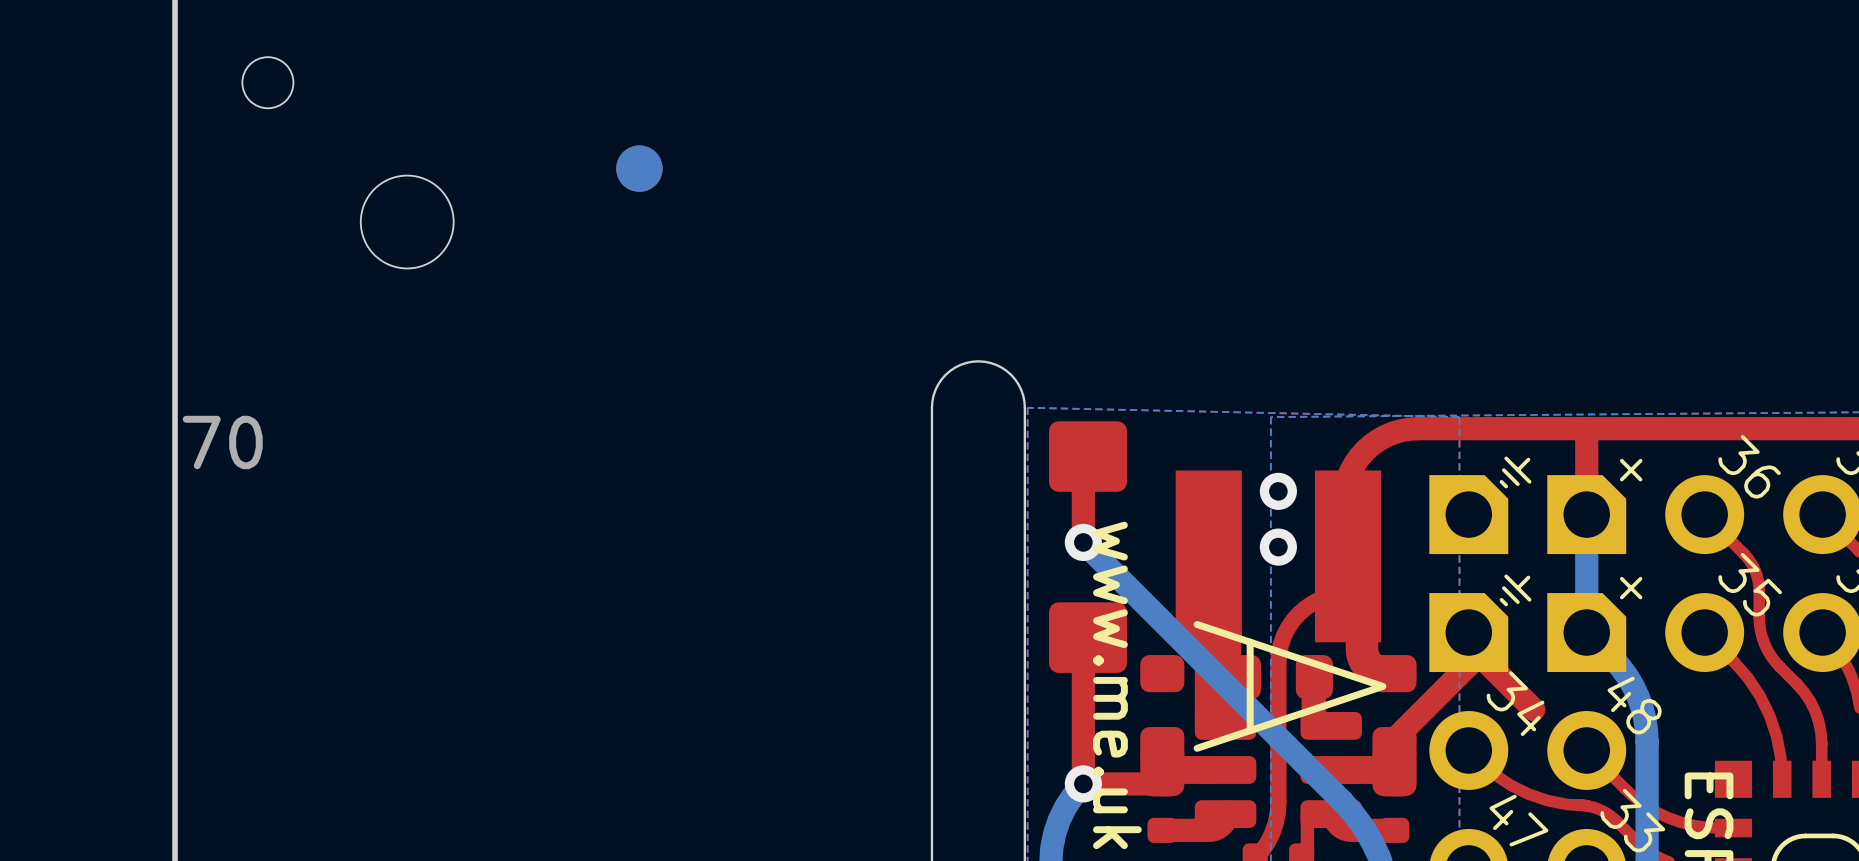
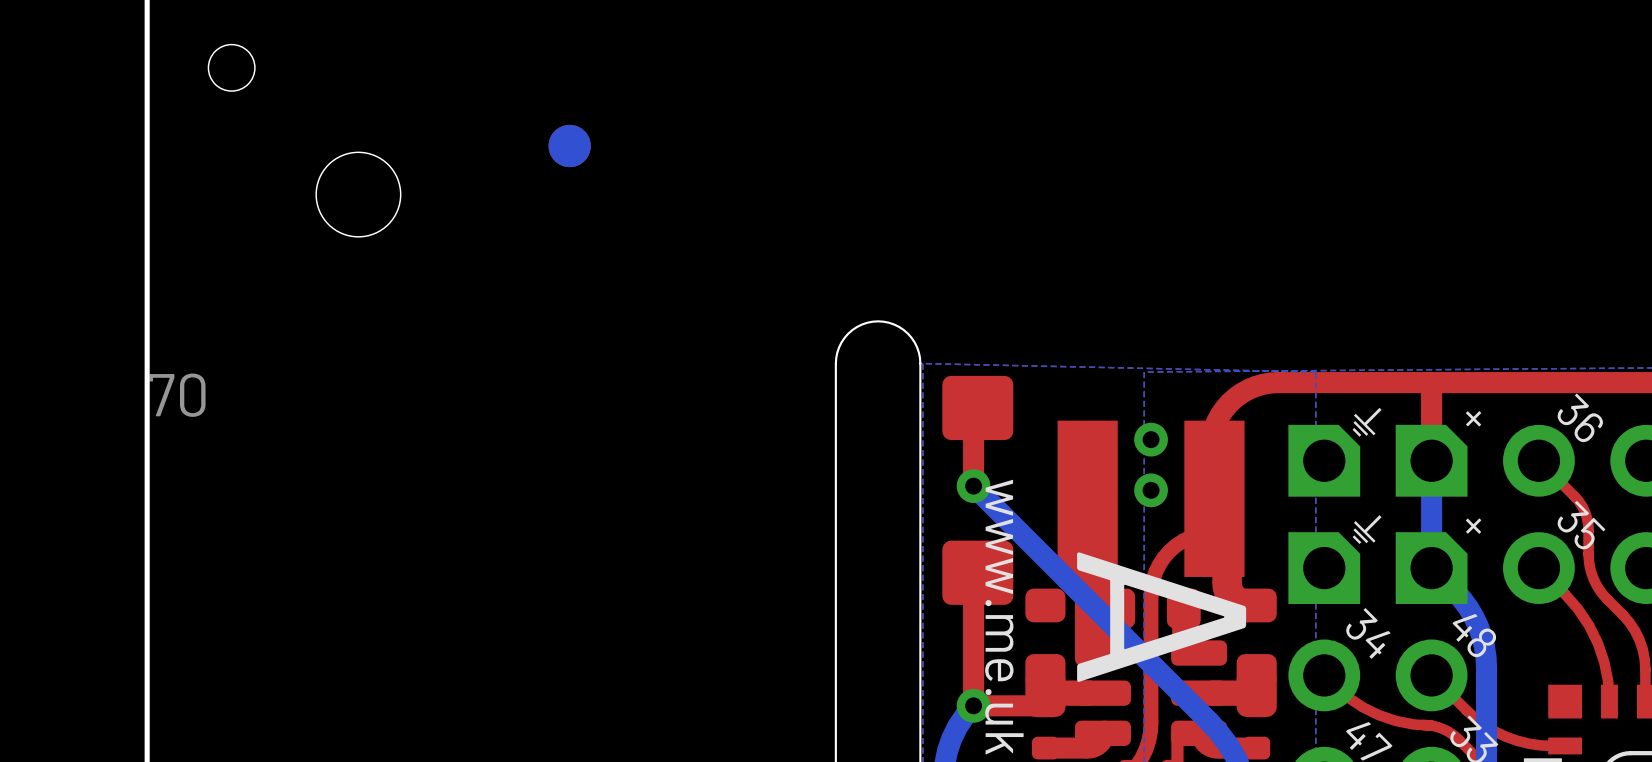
top track: (1468, 632) (1468, 665) (1394, 739) -> none
top track: (1468, 644) (1533, 709) -> none

